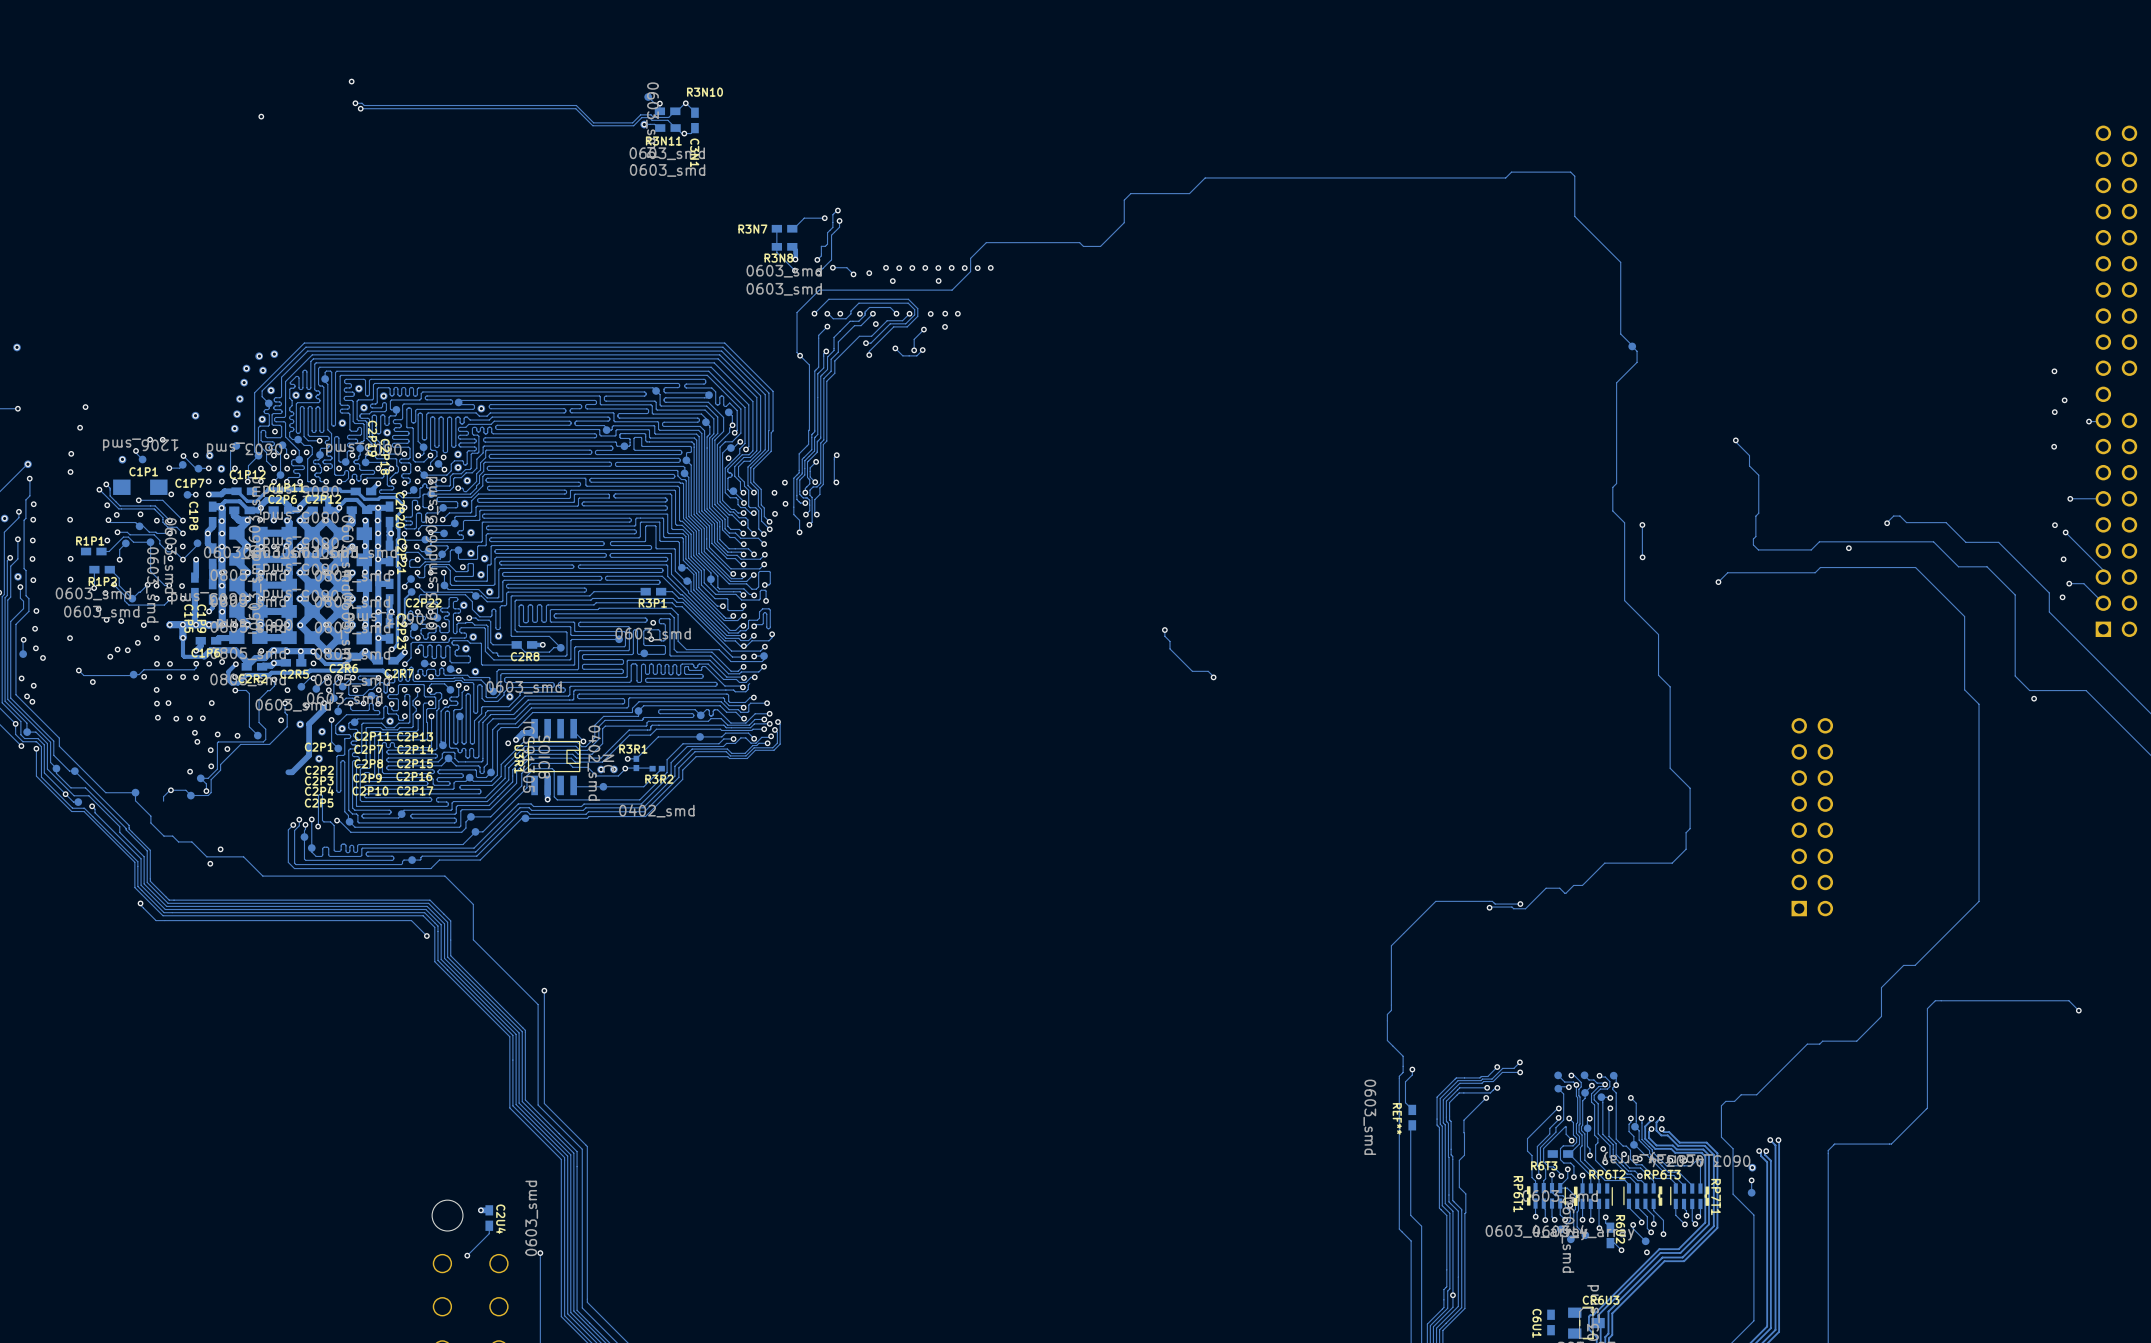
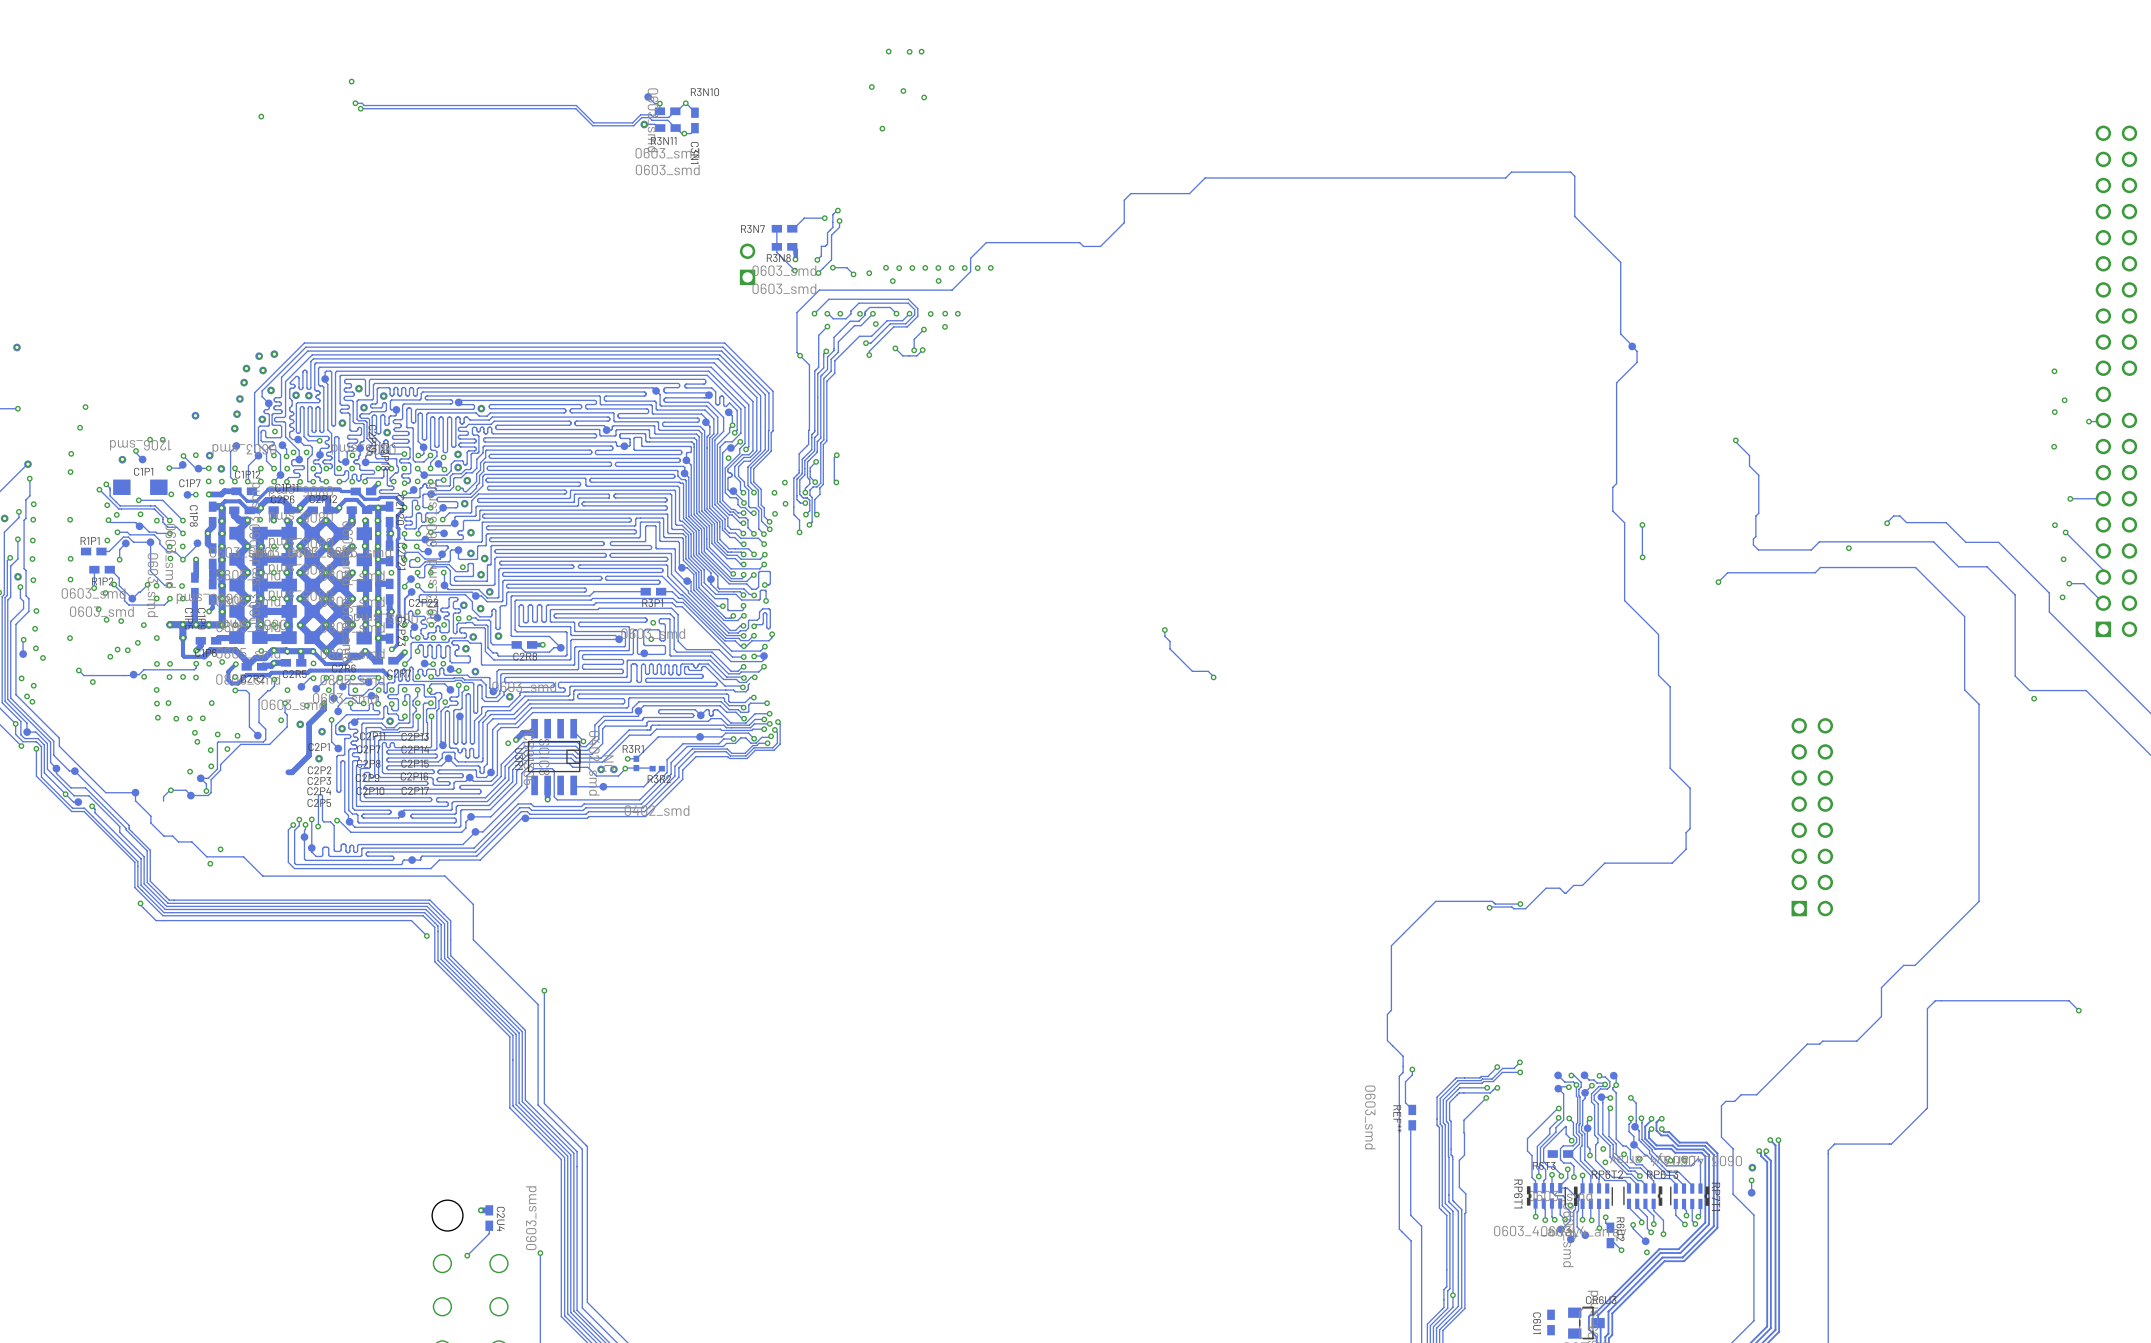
via: none -> (888, 51)
via: none -> (909, 51)
via: none -> (921, 51)
via: none -> (871, 87)
via: none -> (903, 91)
via: none -> (924, 97)
via: none -> (882, 128)
part: none -> (747, 264)

